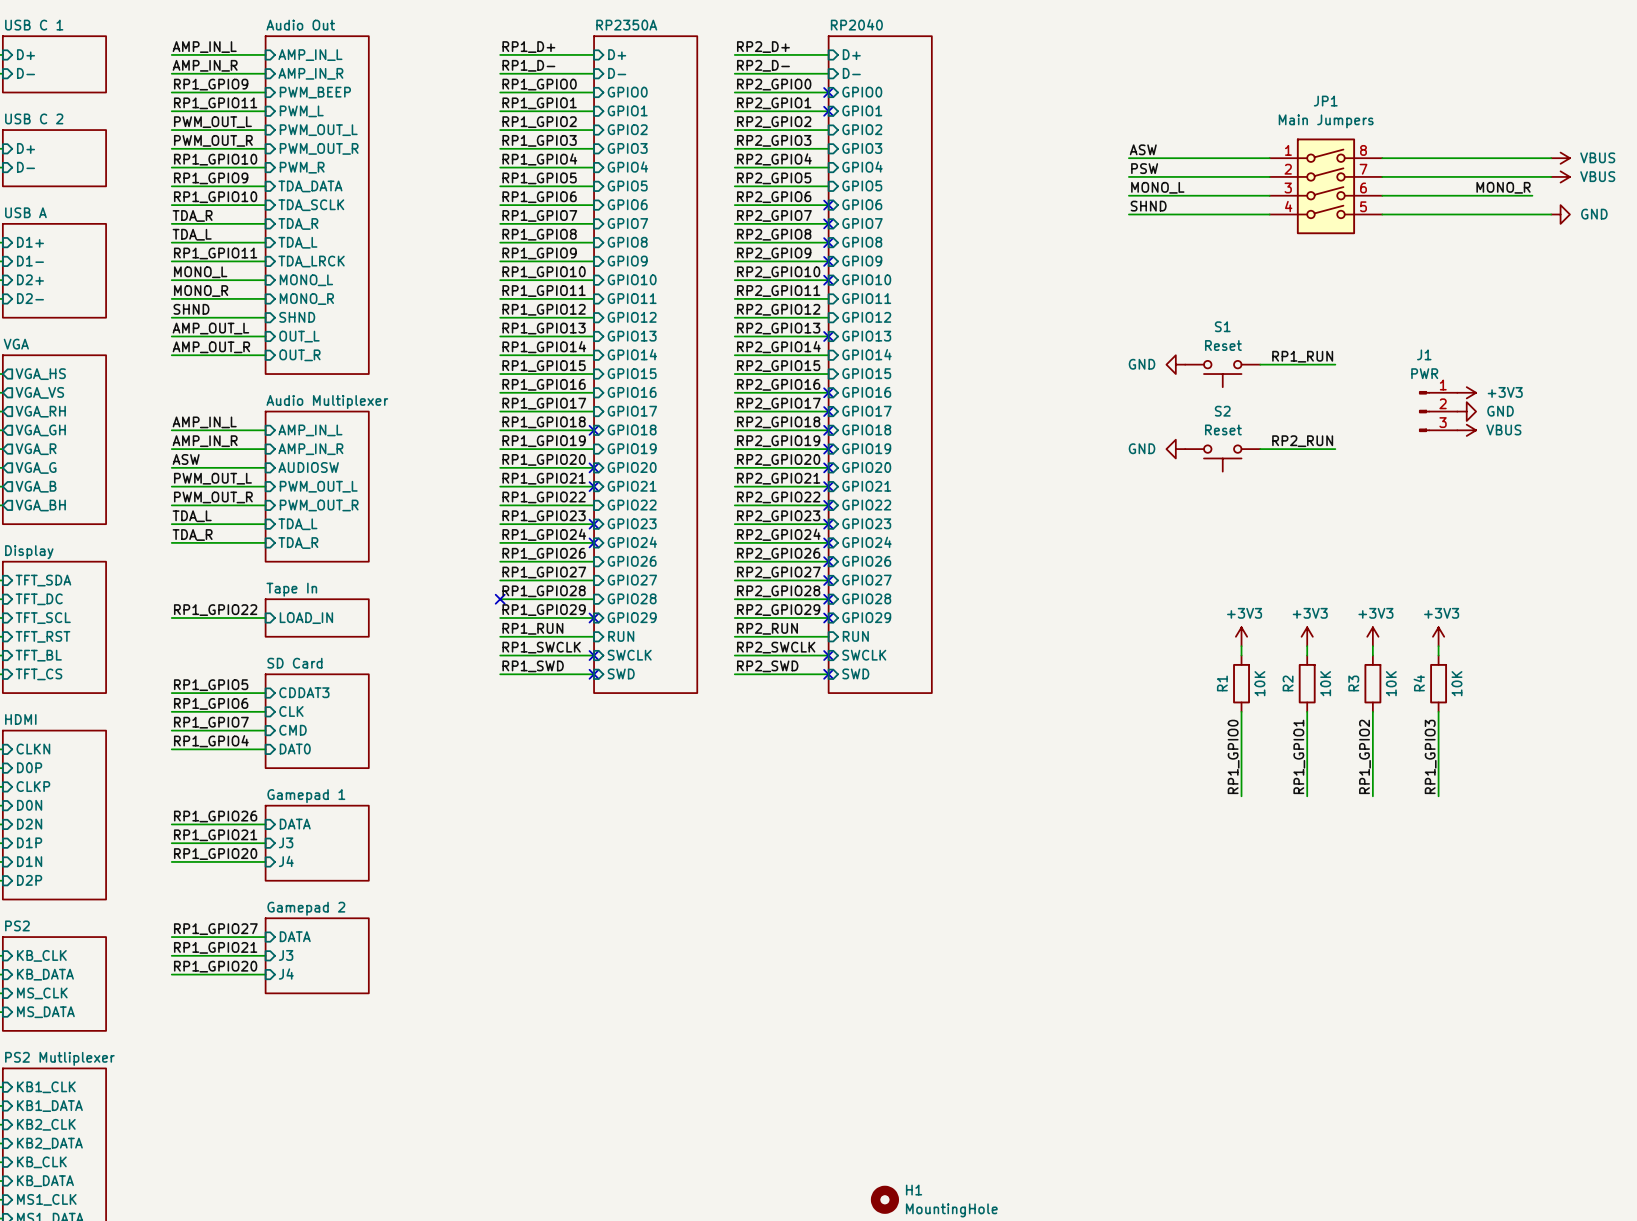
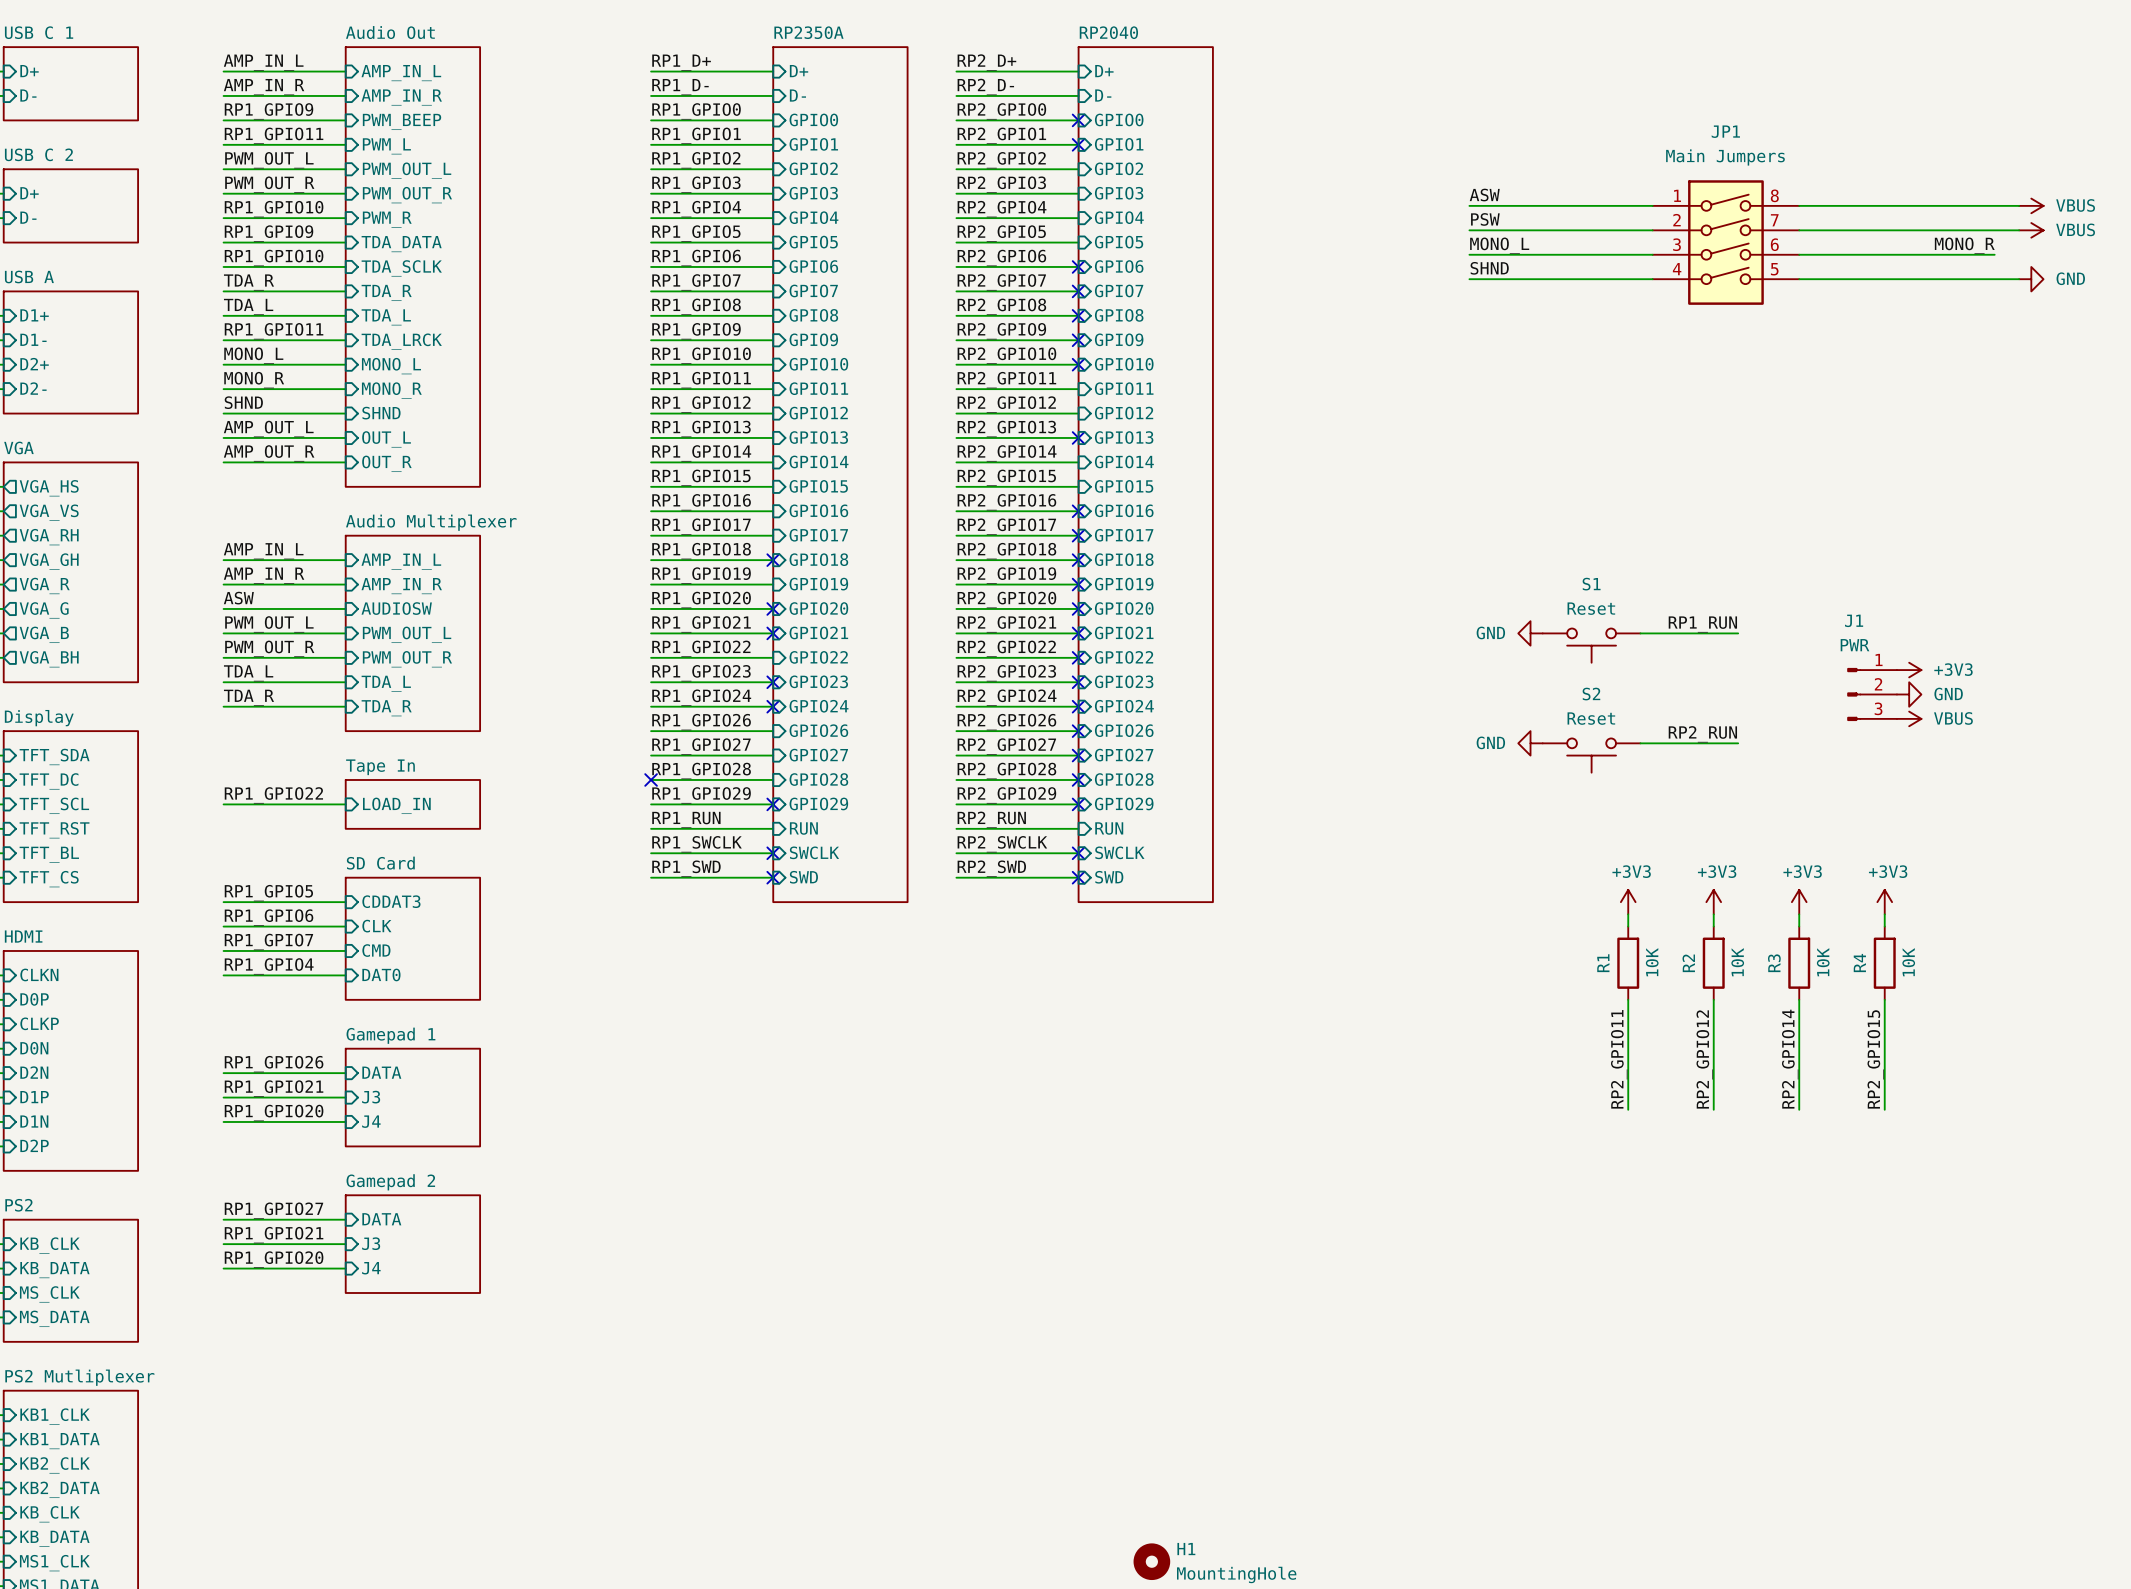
label position: RP1_RUN (1302, 356) -> RP1_RUN (1702, 624)
power symbol: GND (1175, 364) -> none
wire: (1260, 364) (1335, 364) -> (1640, 633) (1738, 633)
S1 position: (1222, 374) -> (1591, 645)
power symbol: +3V3 (1466, 392) -> none
J1 position: (1438, 411) -> (1872, 694)
power symbol position: GND (1466, 411) -> GND (1909, 694)
power symbol position: VBUS (1466, 430) -> VBUS (1909, 718)
label position: RP2_RUN (1302, 441) -> RP2_RUN (1702, 734)
power symbol position: GND (1175, 449) -> GND (1530, 633)
wire: (1260, 449) (1335, 449) -> (1640, 743) (1738, 743)
S2 position: (1222, 458) -> (1591, 755)
power symbol: none -> +3V3 (1909, 670)
power symbol: none -> GND (1530, 743)
power symbol: +3V3 (1241, 636) -> none
power symbol: +3V3 (1307, 636) -> none
power symbol: +3V3 (1372, 636) -> none
power symbol: +3V3 (1438, 636) -> none
wire: (1241, 646) (1241, 655) -> (1628, 914) (1628, 926)
wire: (1307, 646) (1307, 655) -> (1713, 914) (1713, 926)
wire: (1372, 646) (1372, 655) -> (1799, 914) (1799, 926)
wire: (1438, 646) (1438, 655) -> (1884, 914) (1884, 926)
R1 position: (1241, 683) -> (1628, 963)
R2 position: (1307, 683) -> (1713, 963)
R3 position: (1372, 683) -> (1799, 963)
R4 position: (1438, 683) -> (1884, 963)
power symbol: none -> +3V3 (1628, 902)
power symbol: none -> +3V3 (1713, 902)
power symbol: none -> +3V3 (1799, 902)
power symbol: none -> +3V3 (1884, 902)
wire: (1241, 711) (1241, 796) -> (1628, 999) (1628, 1109)
wire: (1307, 711) (1307, 796) -> (1713, 999) (1713, 1109)
wire: (1372, 711) (1372, 796) -> (1799, 999) (1799, 1109)
wire: (1438, 711) (1438, 796) -> (1884, 999) (1884, 1109)
label: RP1_GPIO0 (1233, 756) -> RP2_GPIO11 (1619, 1059)
label: RP1_GPIO1 (1299, 756) -> RP2_GPIO12 (1704, 1059)
label: RP1_GPIO2 (1364, 756) -> RP2_GPIO14 (1790, 1059)
label: RP1_GPIO3 (1430, 756) -> RP2_GPIO15 (1875, 1059)

